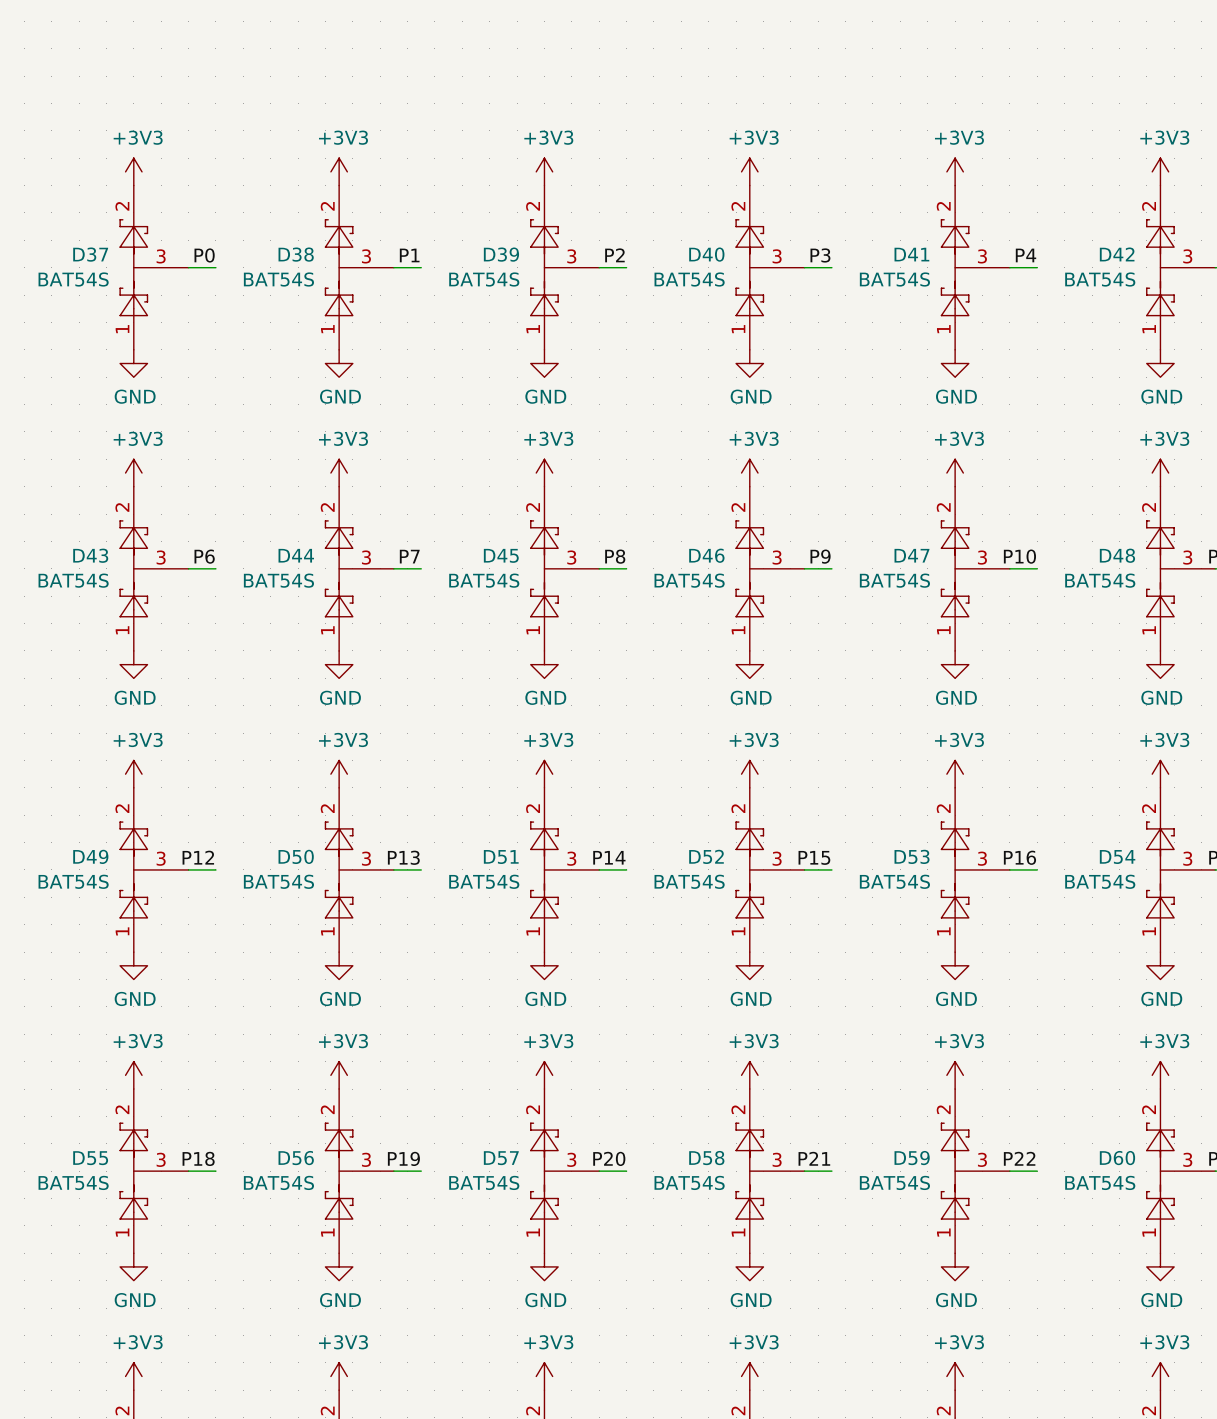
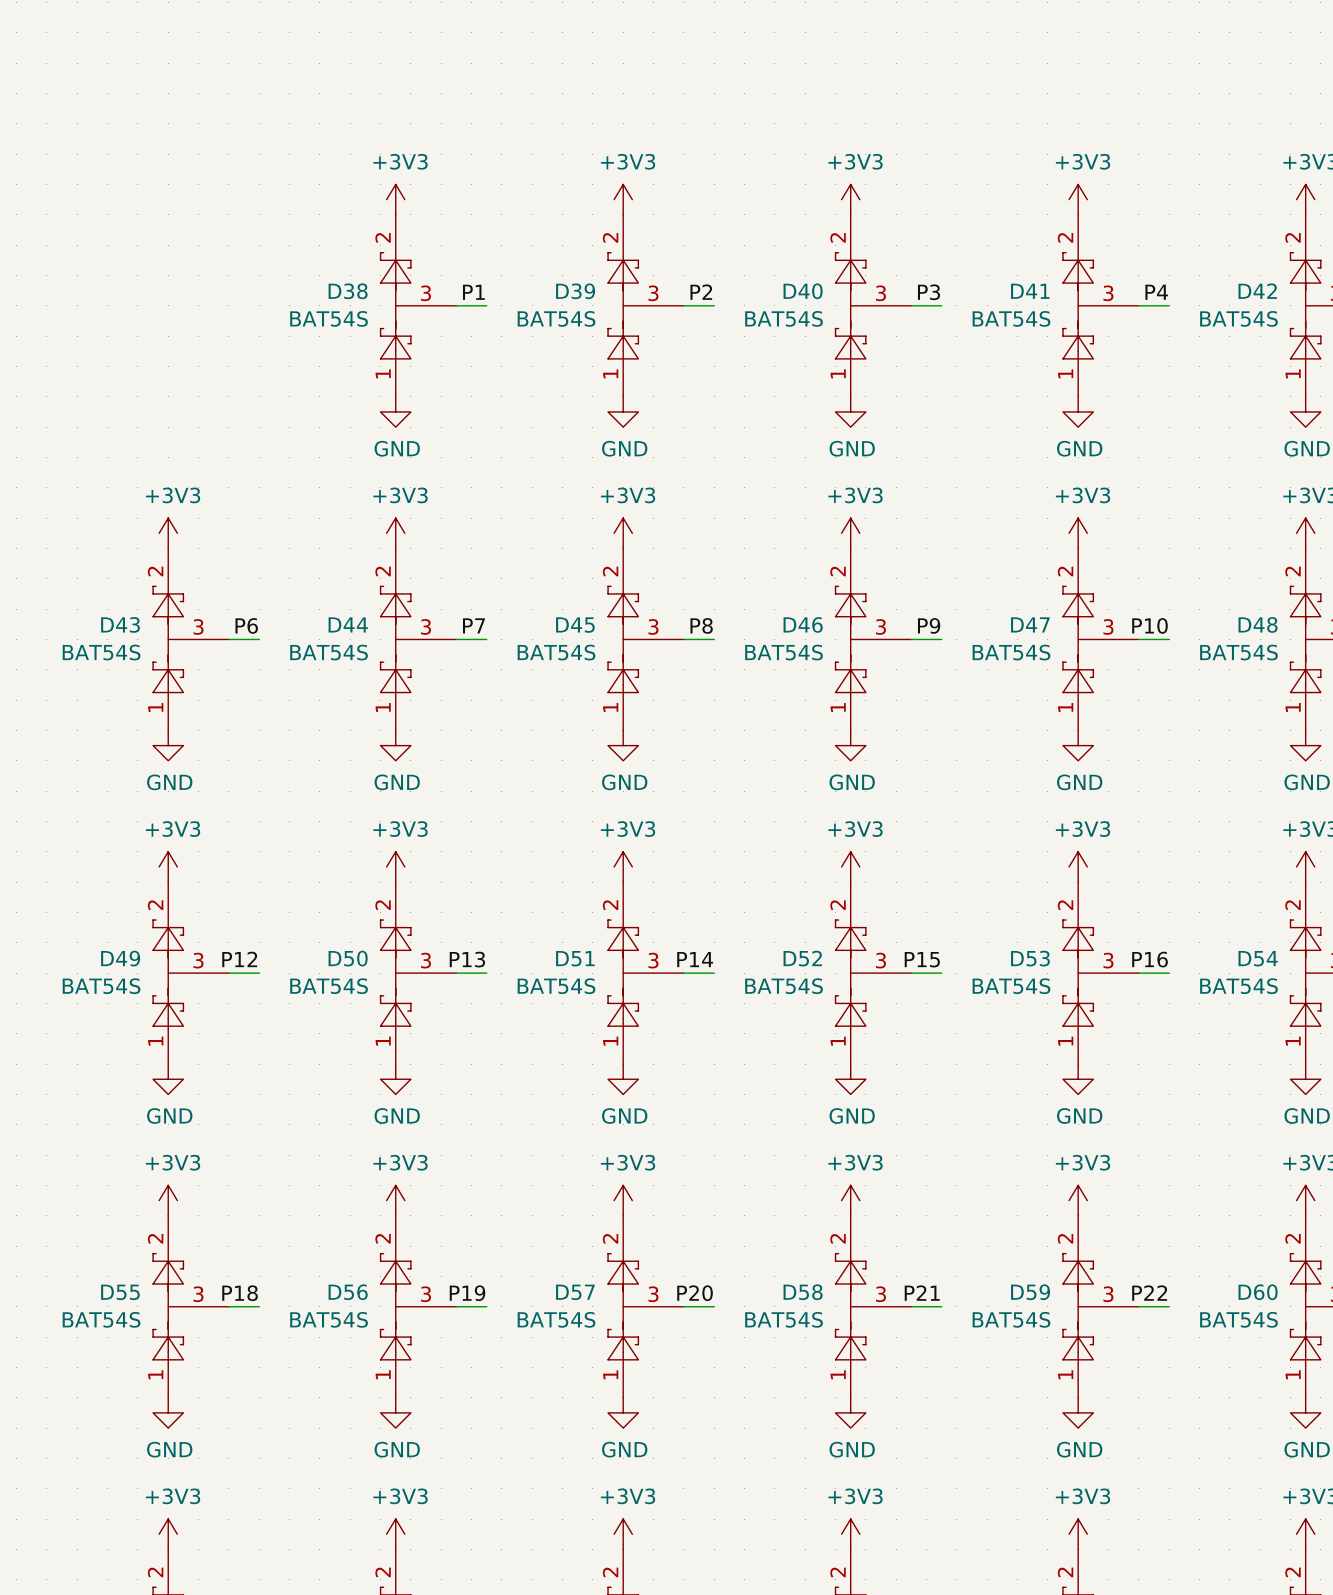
power symbol: +3V3 (133, 171) -> none
label: P0 (204, 255) -> none
D37: BAT54S (154, 267) -> none
wire: (188, 267) (215, 267) -> none
power symbol: GND (133, 363) -> none

